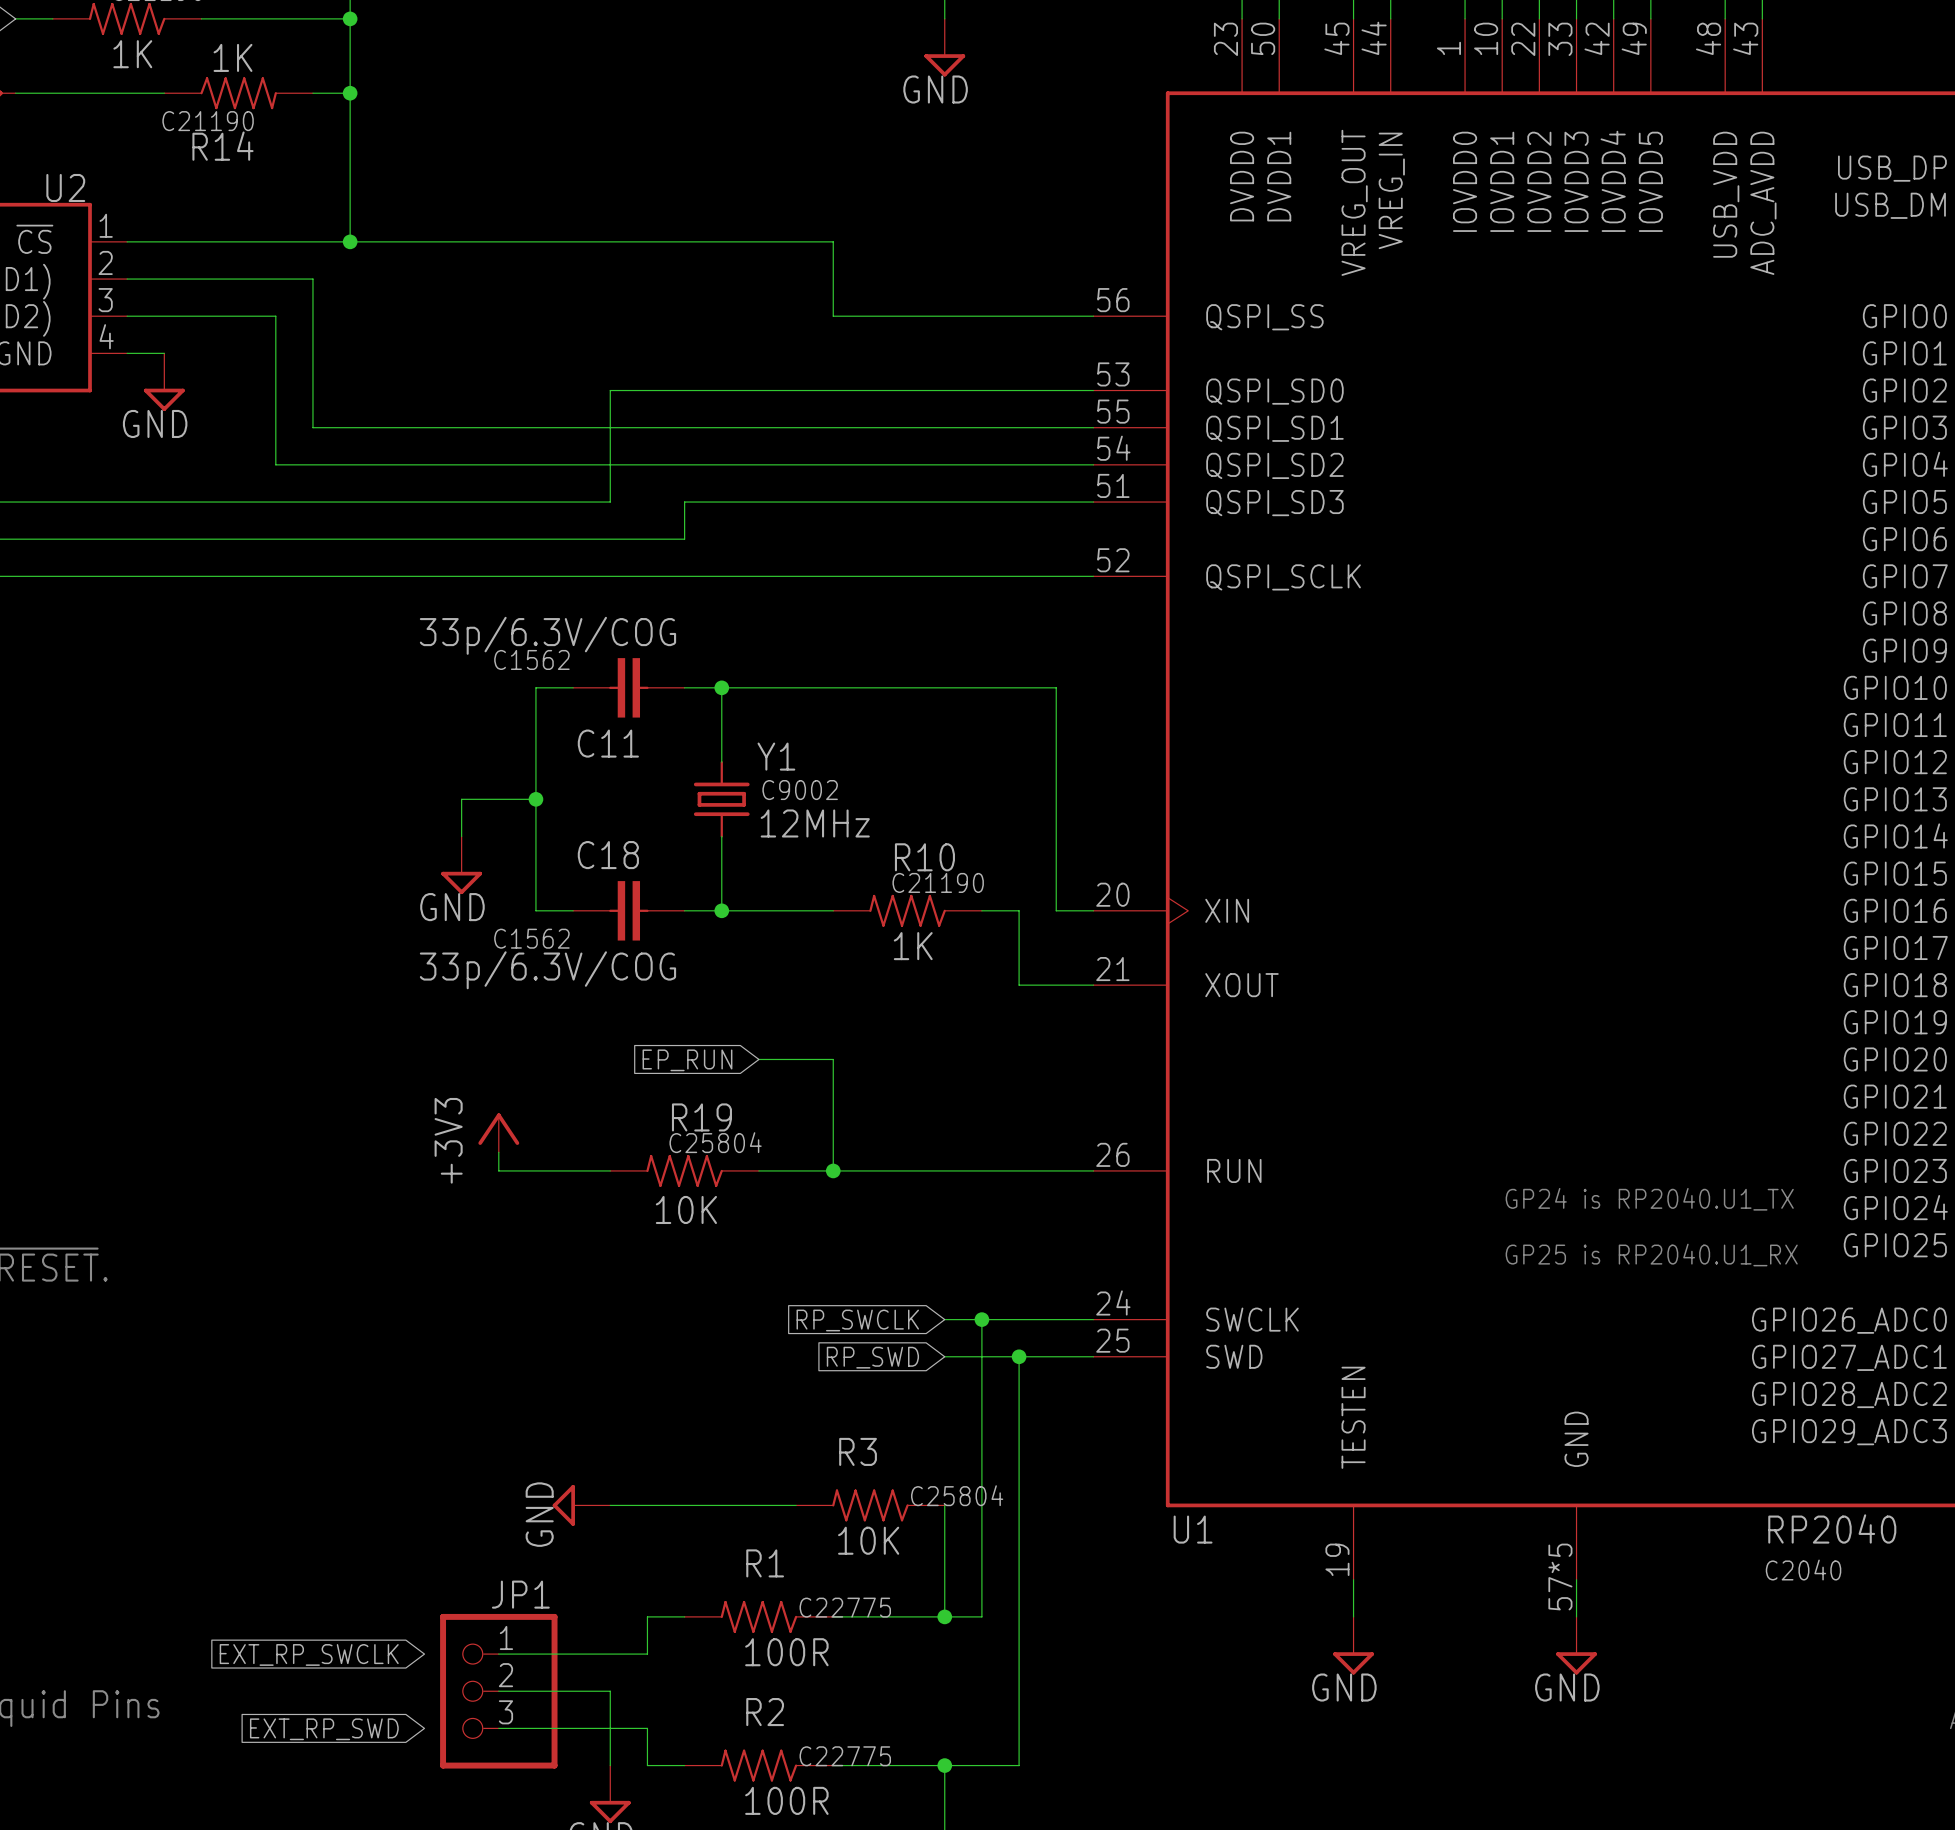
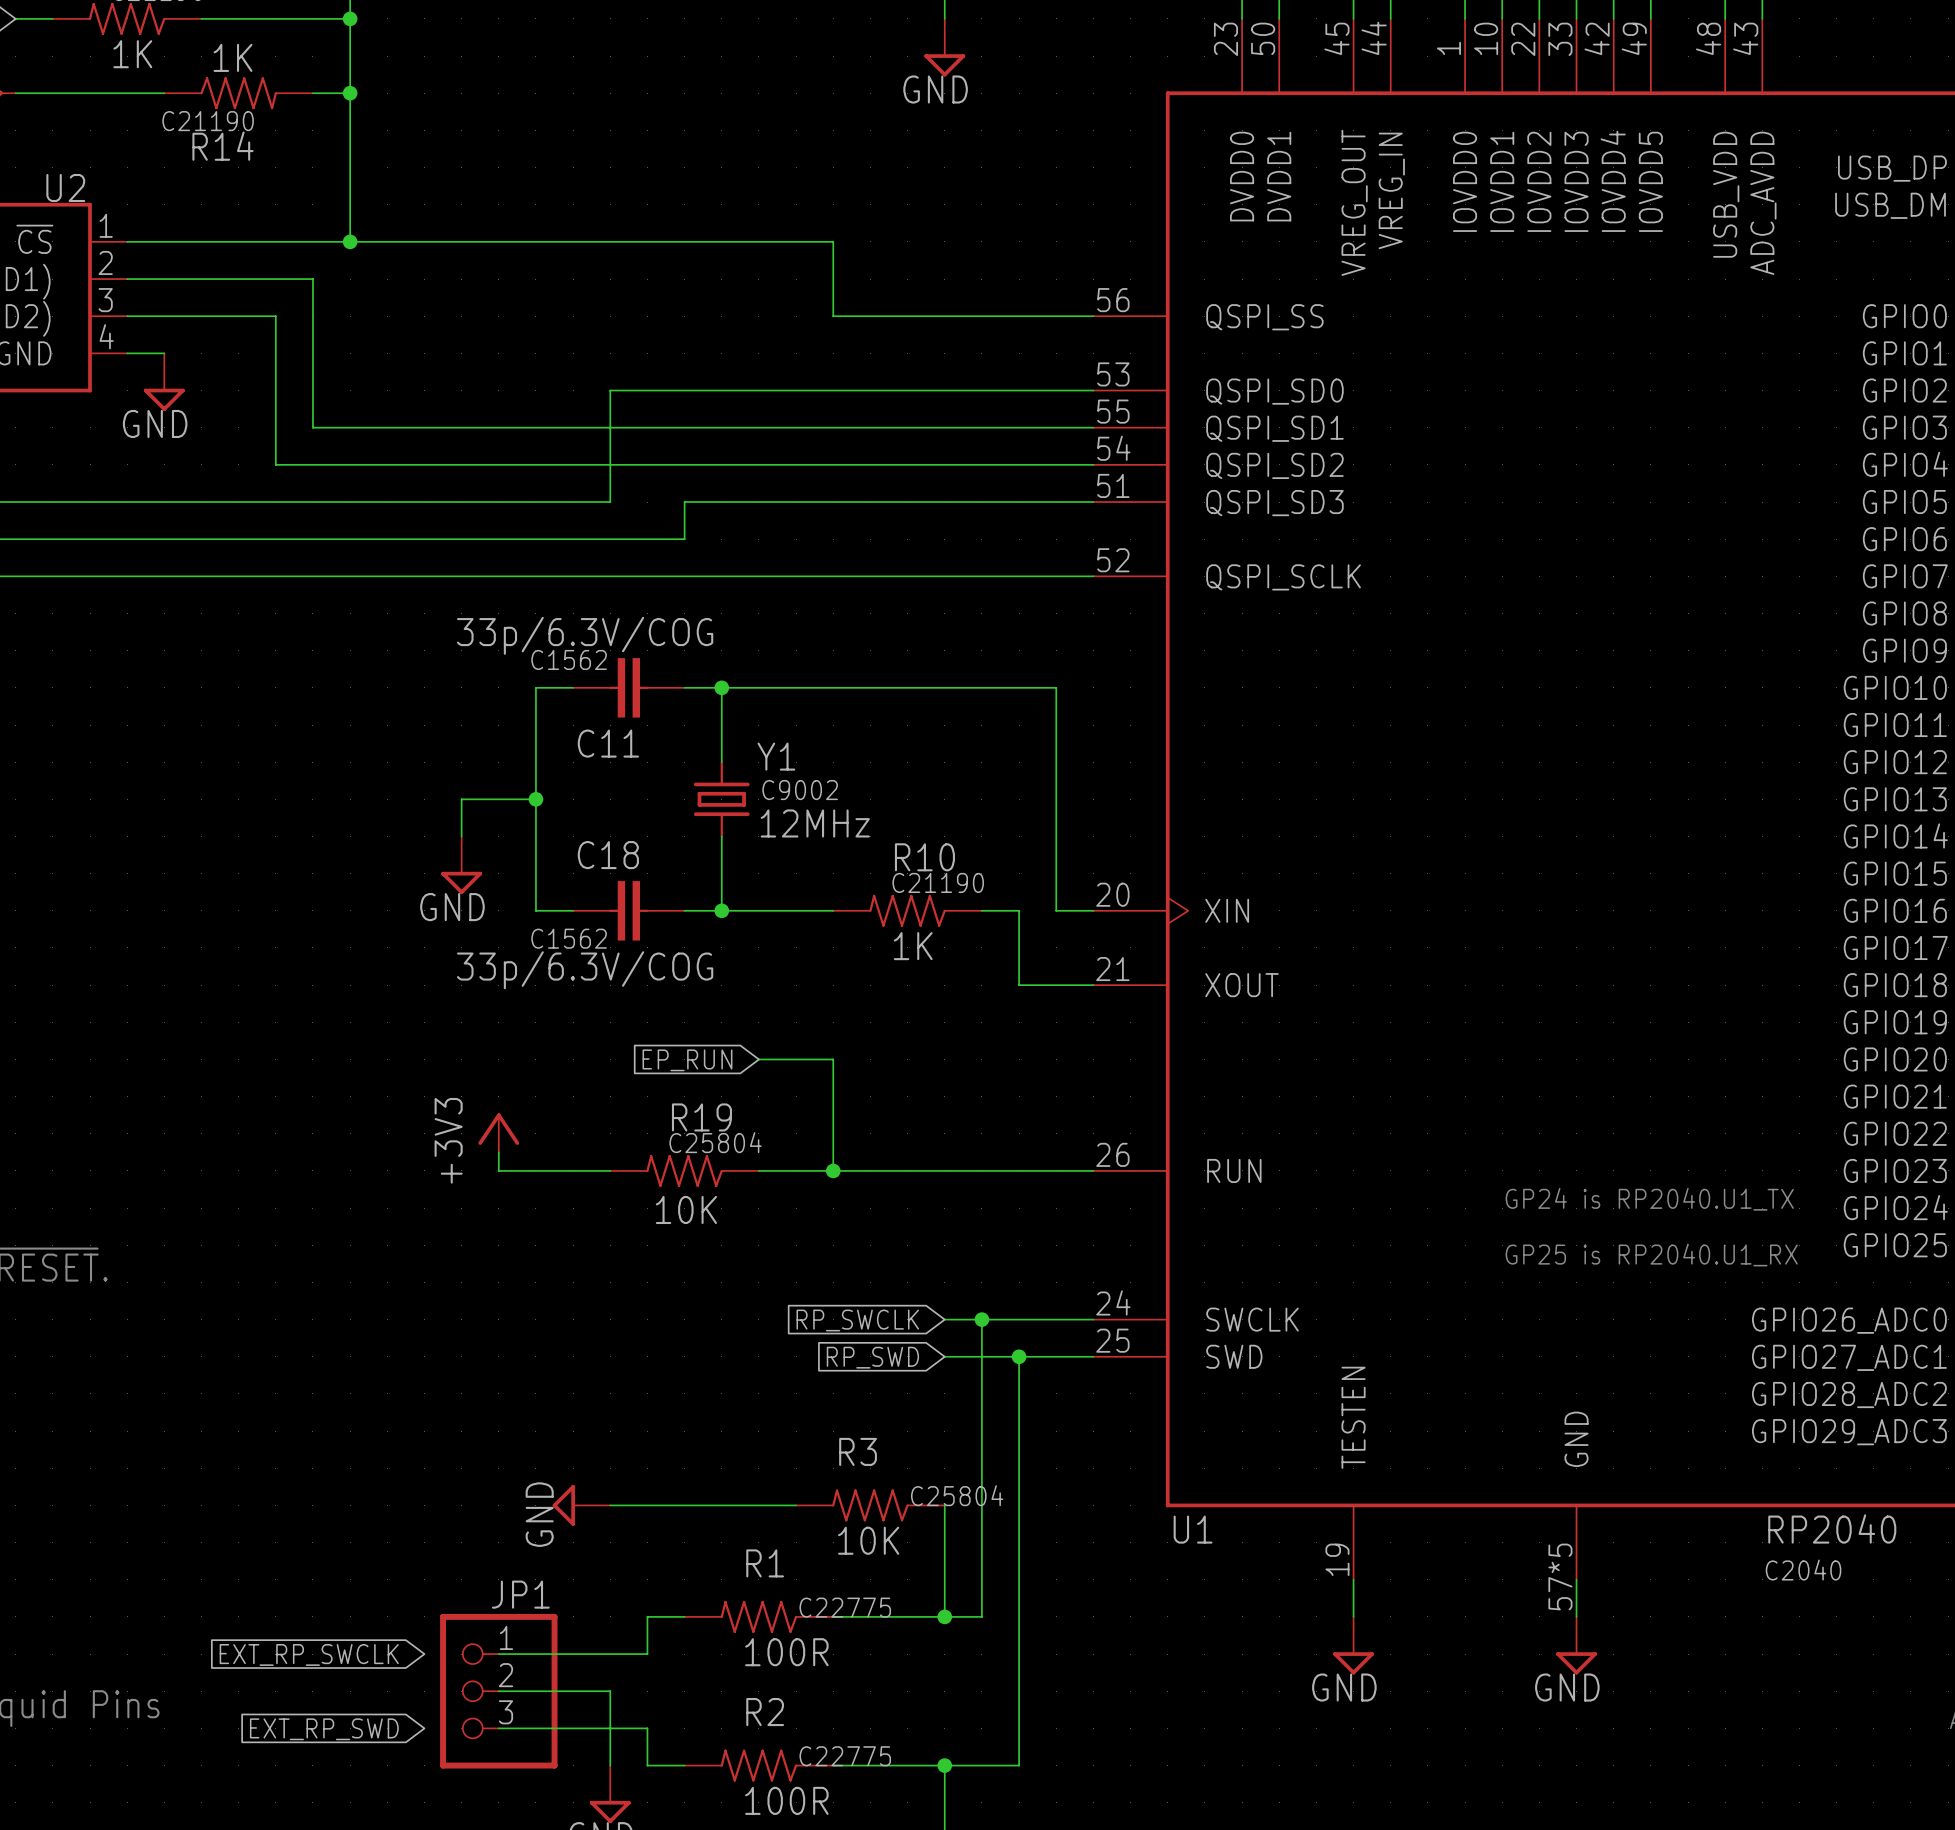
C11 value position: 33p/6.3V/COG (547, 635) -> 33p/6.3V/COG (585, 635)
C11 text position: C1562 (531, 659) -> C1562 (569, 659)
C18 text position: C1562 (531, 938) -> C1562 (569, 938)
C18 value position: 33p/6.3V/COG (547, 970) -> 33p/6.3V/COG (585, 970)

